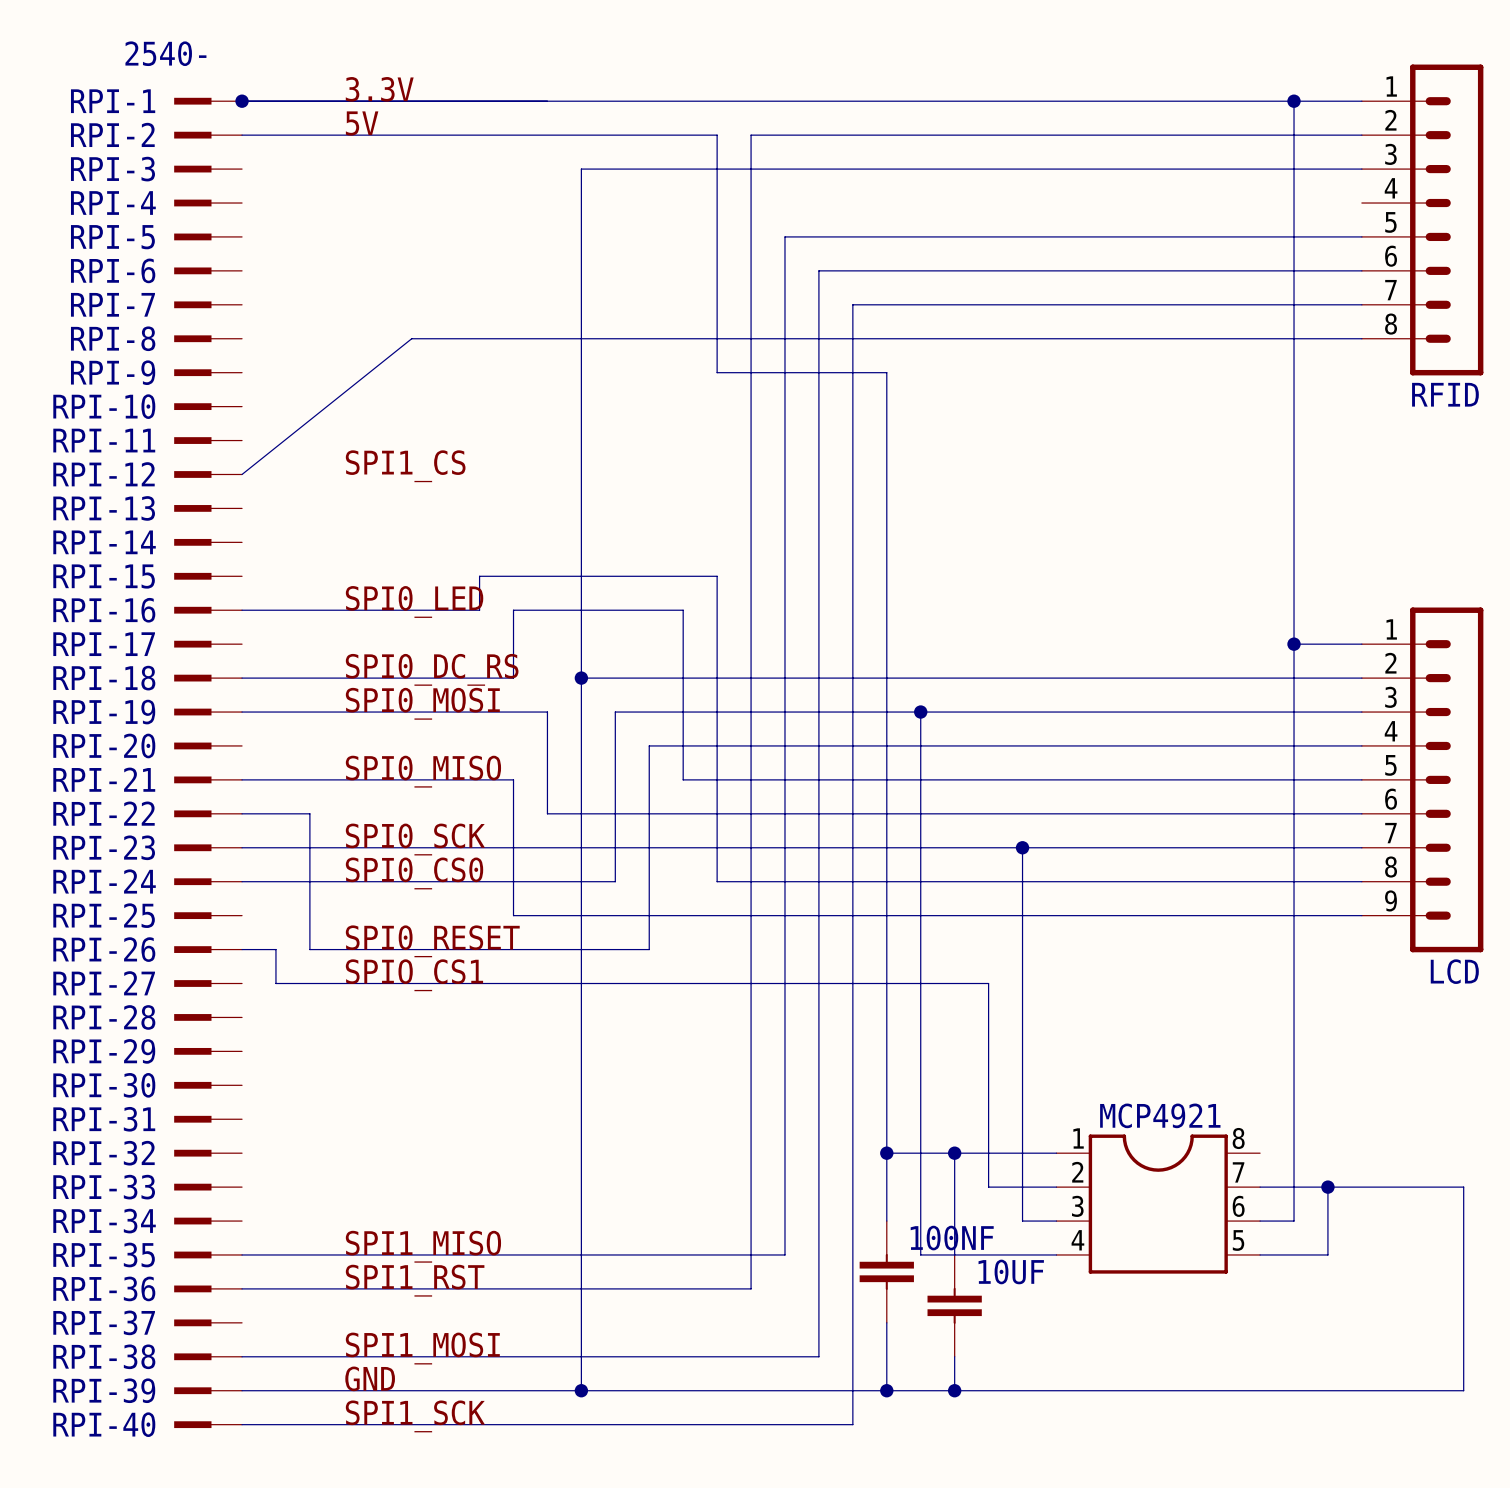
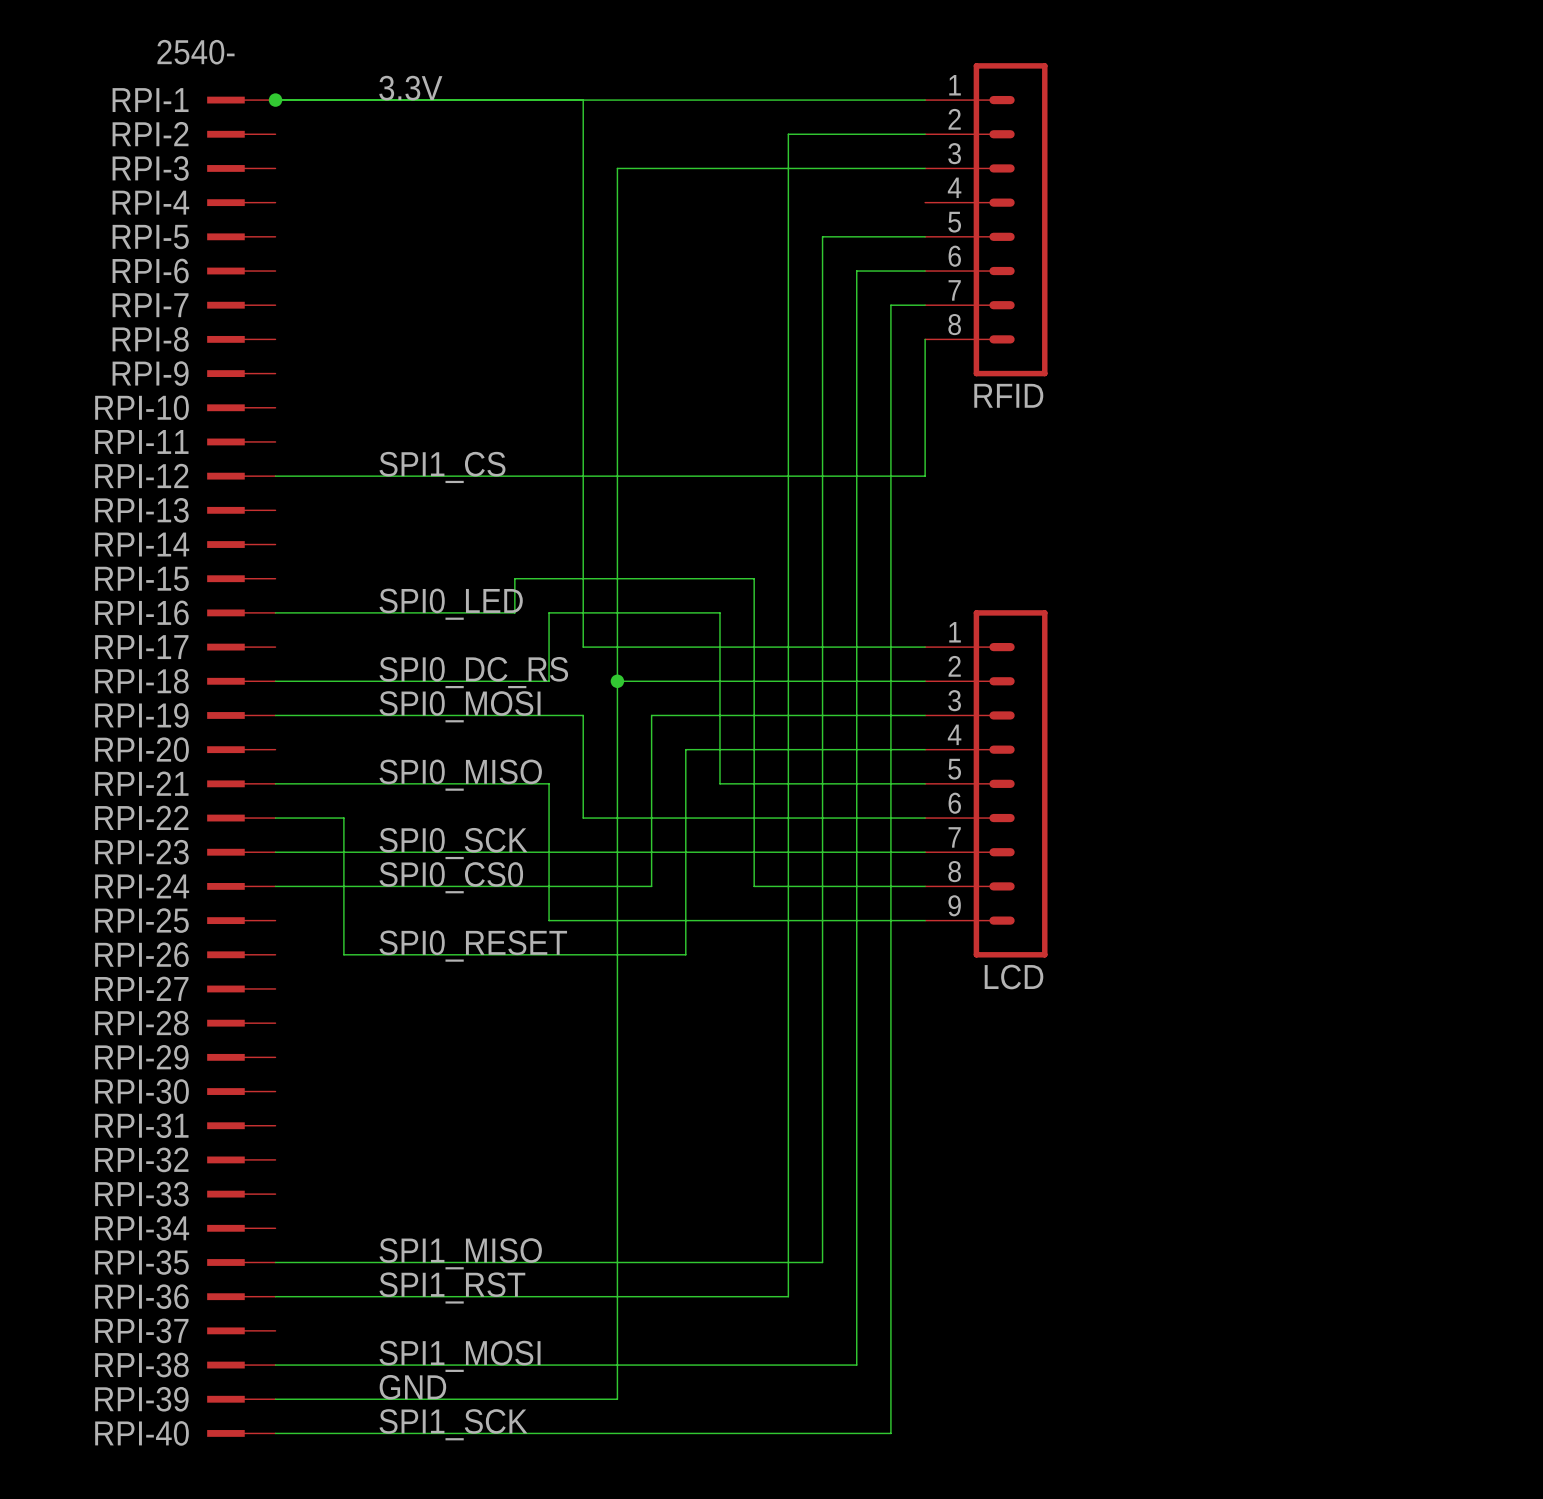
wire: none -> (583, 100) (583, 647) (925, 647)
wire: (886, 101) (1361, 101) -> none
wire: (1294, 101) (1294, 1221) (1260, 1221) -> none
junction: (1294, 101) -> none
label: 5V (362, 123) -> none
wire: (242, 135) (717, 135) (717, 372) (886, 372) -> (925, 339) (925, 373)
wire: (886, 135) (1361, 135) -> none
wire: (886, 169) (1361, 169) -> none
RFID: none -> (986, 219)
RFID: (1422, 219) -> none
wire: (886, 236) (1361, 236) -> none
wire: (886, 270) (1361, 270) -> none
wire: (886, 304) (1361, 304) -> none
wire: (1361, 338) (411, 338) (242, 474) -> (925, 476) (275, 476)
wire: (886, 474) (886, 1221) -> none
wire: (1294, 644) (1361, 644) -> none
junction: (1294, 644) -> none
wire: (886, 678) (1361, 678) -> none
wire: (886, 712) (1361, 712) -> none
wire: (920, 712) (920, 1254) (1056, 1254) -> none
junction: (920, 712) -> none
wire: (886, 745) (1361, 745) -> none
wire: (886, 779) (1361, 779) -> none
LCD: none -> (986, 783)
LCD: (1422, 779) -> none
wire: (886, 813) (1361, 813) -> none
wire: (886, 847) (1361, 847) -> none
wire: (1022, 847) (1022, 1221) (1056, 1221) -> none
junction: (1022, 847) -> none
wire: (886, 881) (1361, 881) -> none
wire: (886, 915) (1361, 915) -> none
wire: (242, 949) (275, 949) (275, 983) (988, 983) (988, 1187) (1056, 1187) -> none
label: SPIO_CS1 (414, 975) -> none
wire: (886, 1153) (1056, 1153) -> none
junction: (886, 1153) -> none
wire: (954, 1153) (954, 1254) -> none
junction: (954, 1153) -> none
wire: (1260, 1187) (1463, 1187) (1463, 1390) (581, 1390) -> none
wire: (1327, 1187) (1327, 1254) (1260, 1254) -> none
junction: (1327, 1187) -> none
MCP4921: (1158, 1204) -> none
100NF: (886, 1271) -> none
10UF: (954, 1305) -> none
wire: (886, 1322) (886, 1390) -> none
wire: (954, 1356) (954, 1390) -> none
junction: (581, 1390) -> none
junction: (886, 1390) -> none
junction: (954, 1390) -> none

